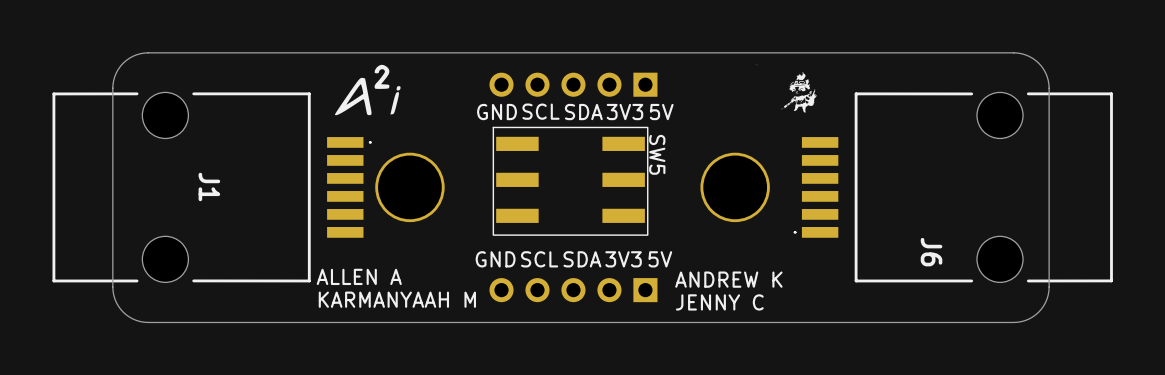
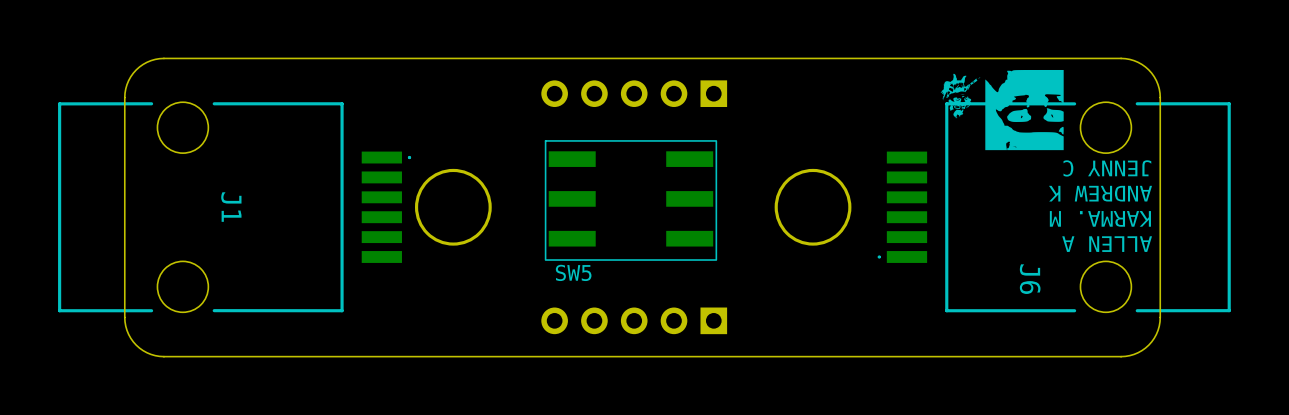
drawing: [753, 63, 817, 113] -> none
drawing: none -> [940, 69, 1064, 151]
drawing: [334, 64, 401, 116] -> none
text: SCL (540, 111) -> none
text: GND (497, 112) -> none
text: SDA (583, 112) -> none
text: 3V3 (624, 112) -> none
text: 5V (661, 112) -> none
text: none -> JENNY C (1107, 168)
SW5 name rotation: 0° (657, 154) -> 90° counterclockwise (573, 272)
SW5 name position: SW5 (657, 154) -> SW5 (573, 272)
text: none -> ANDREW K (1100, 193)
text: none -> KARMA. M (1100, 218)
text: none -> ALLEN A (1107, 244)
text: GND (495, 259) -> none
text: SCL (539, 259) -> none
text: SDA (582, 259) -> none
text: 3V3 (623, 259) -> none
text: 5V (660, 259) -> none
text: ALLEN A (359, 276) -> none
text: ANDREW K (728, 279) -> none
text: KARMANYAAH M (397, 299) -> none
text: JENNY C (719, 302) -> none

